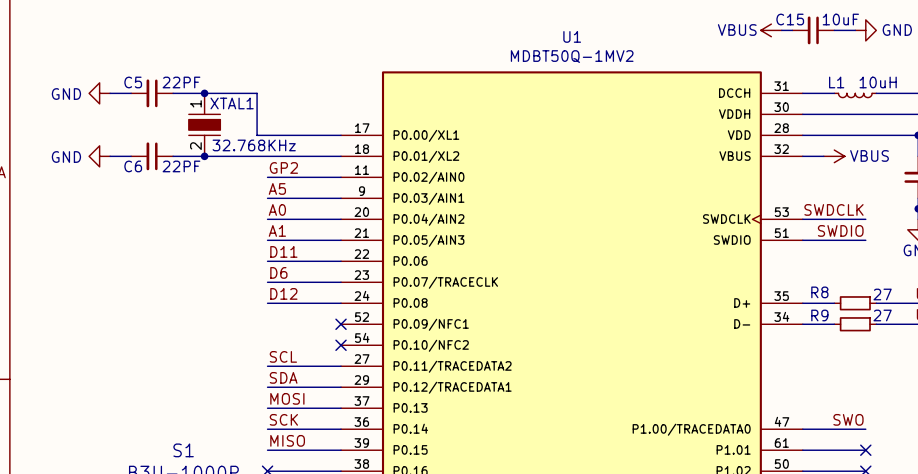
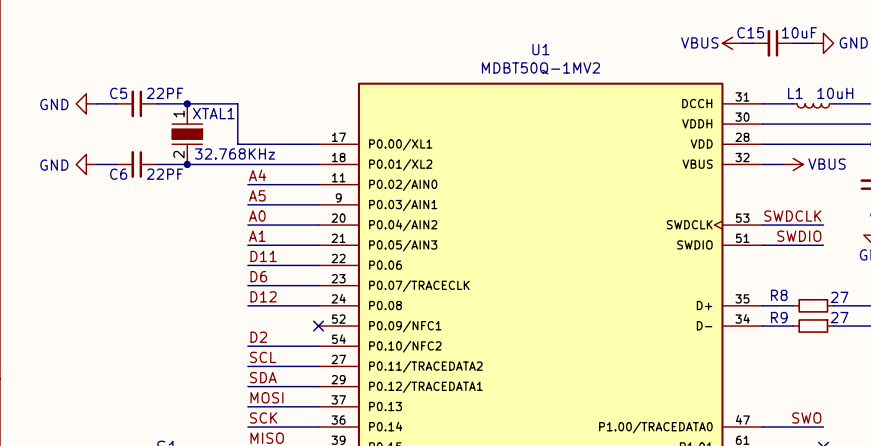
label: GP2 (283, 167) -> A4 (257, 175)
label: none -> D2 (258, 337)
wire: none -> (247, 346) (318, 346)
no-connect mark: (341, 345) -> none

